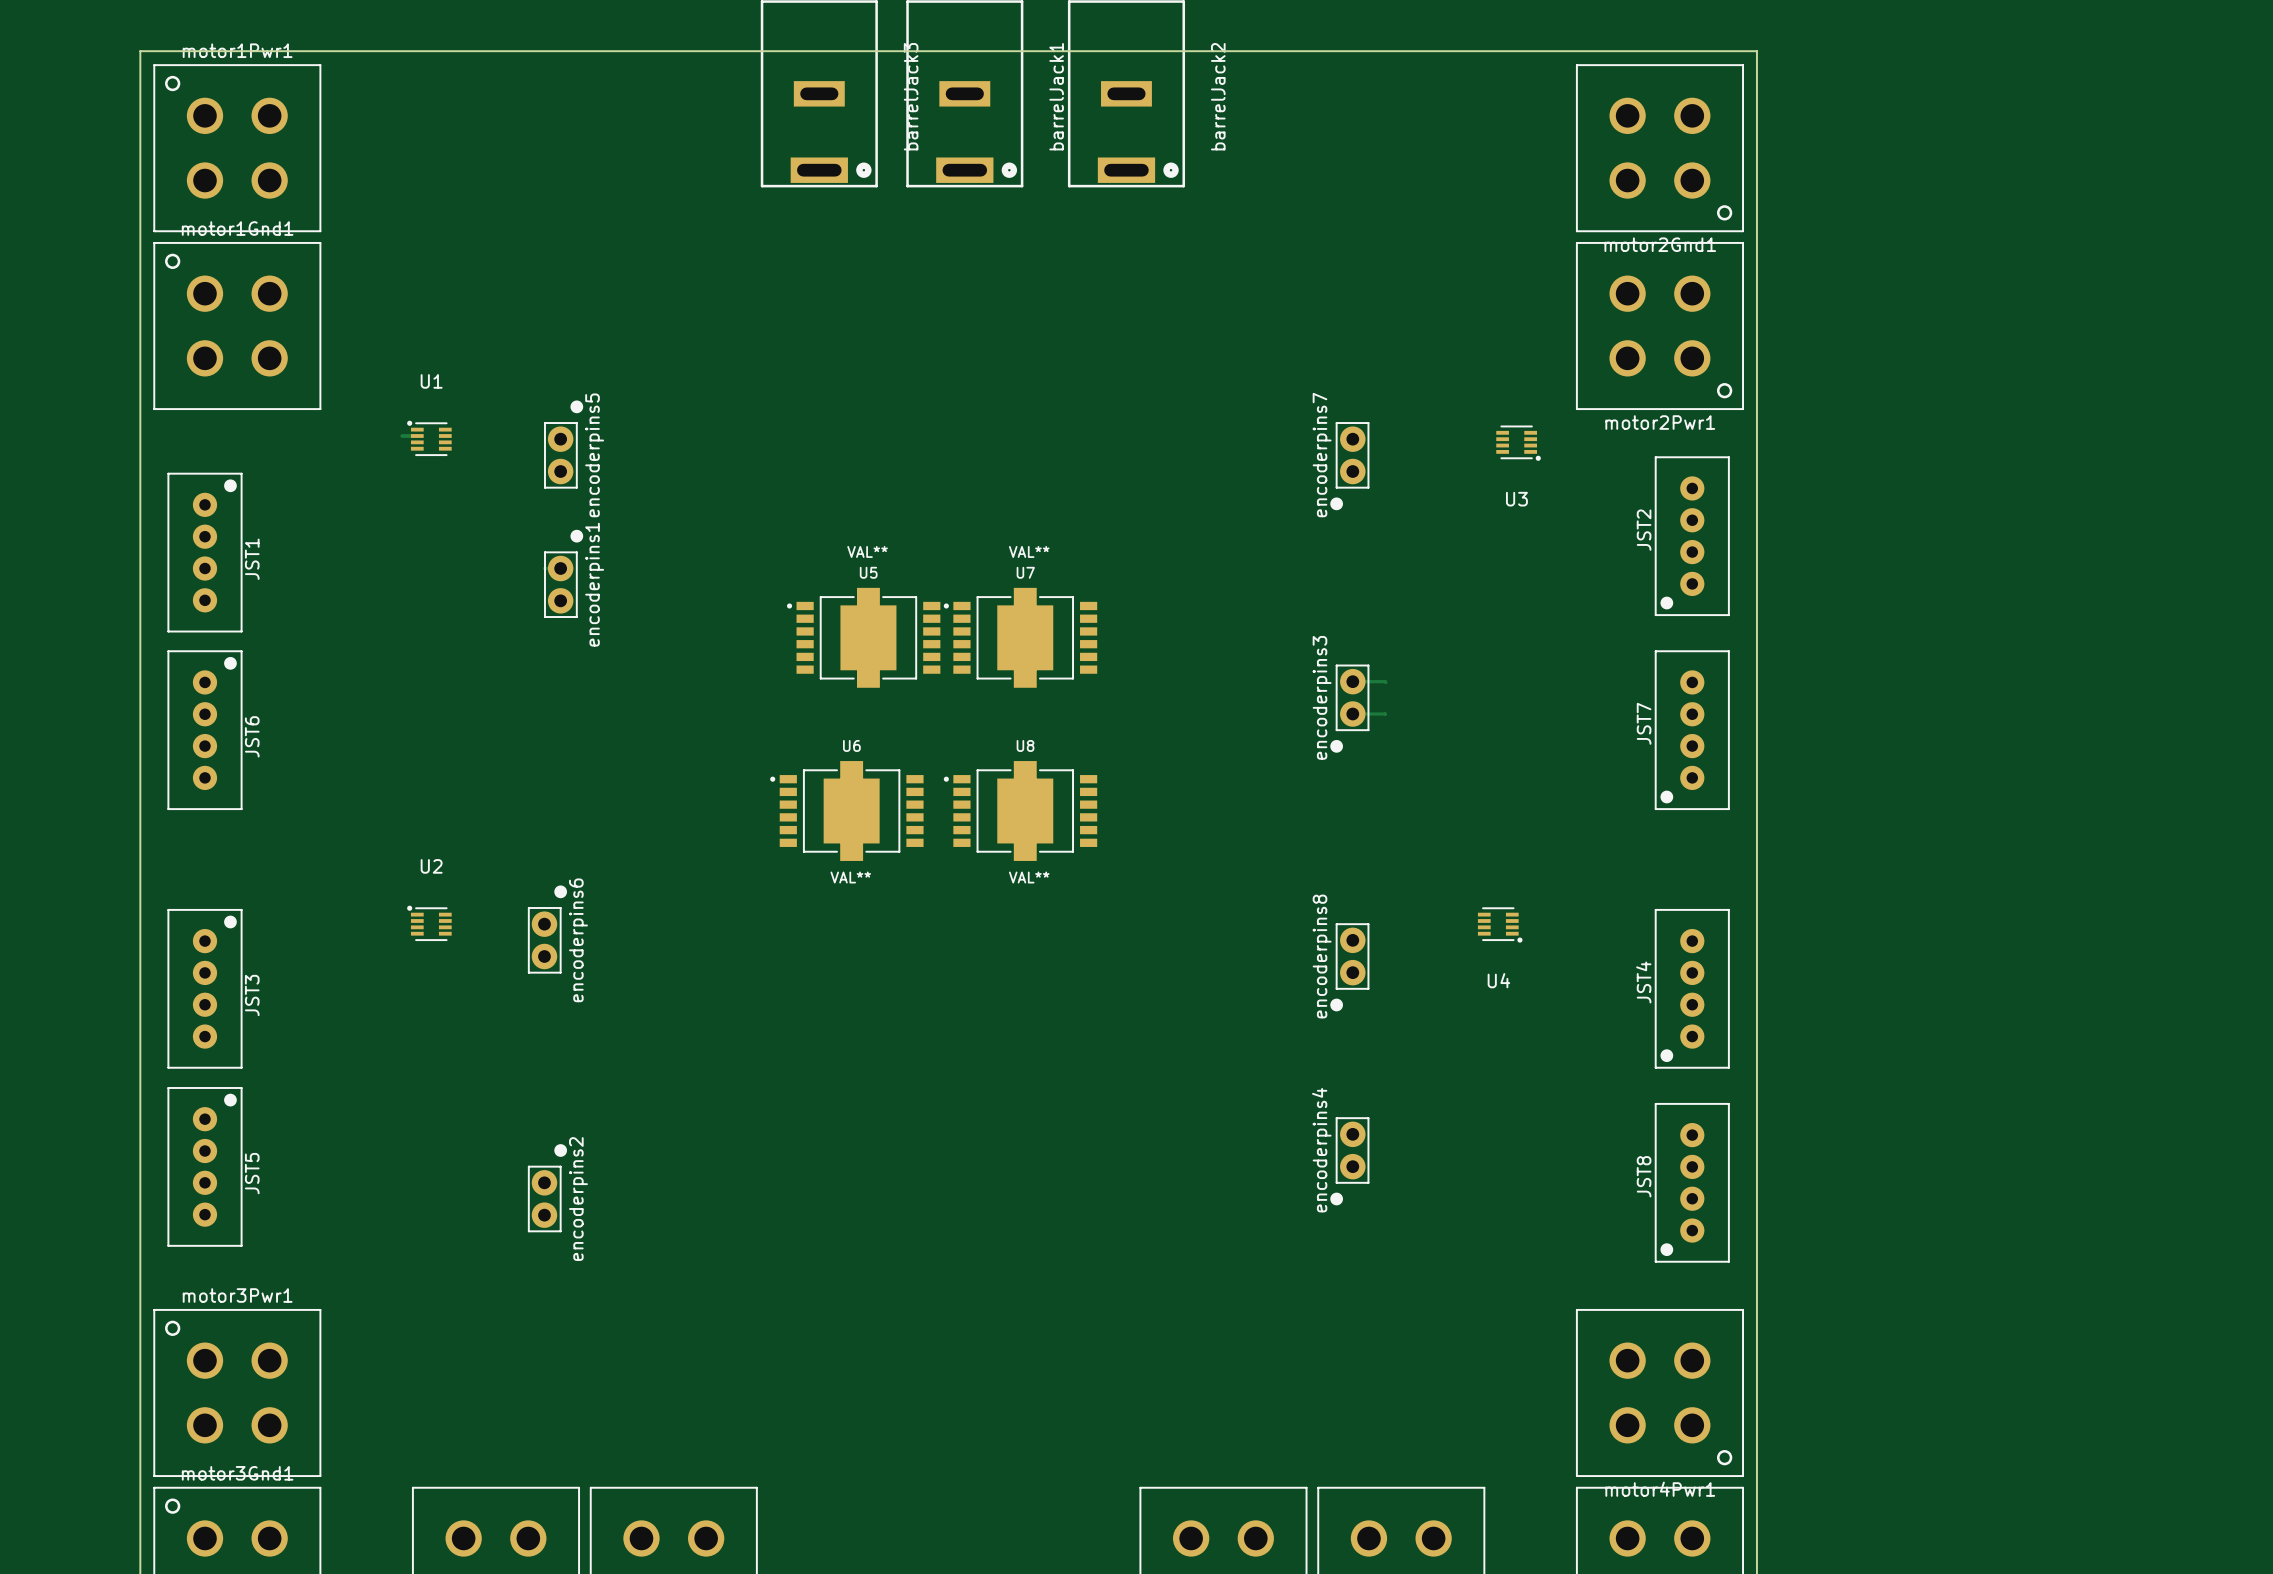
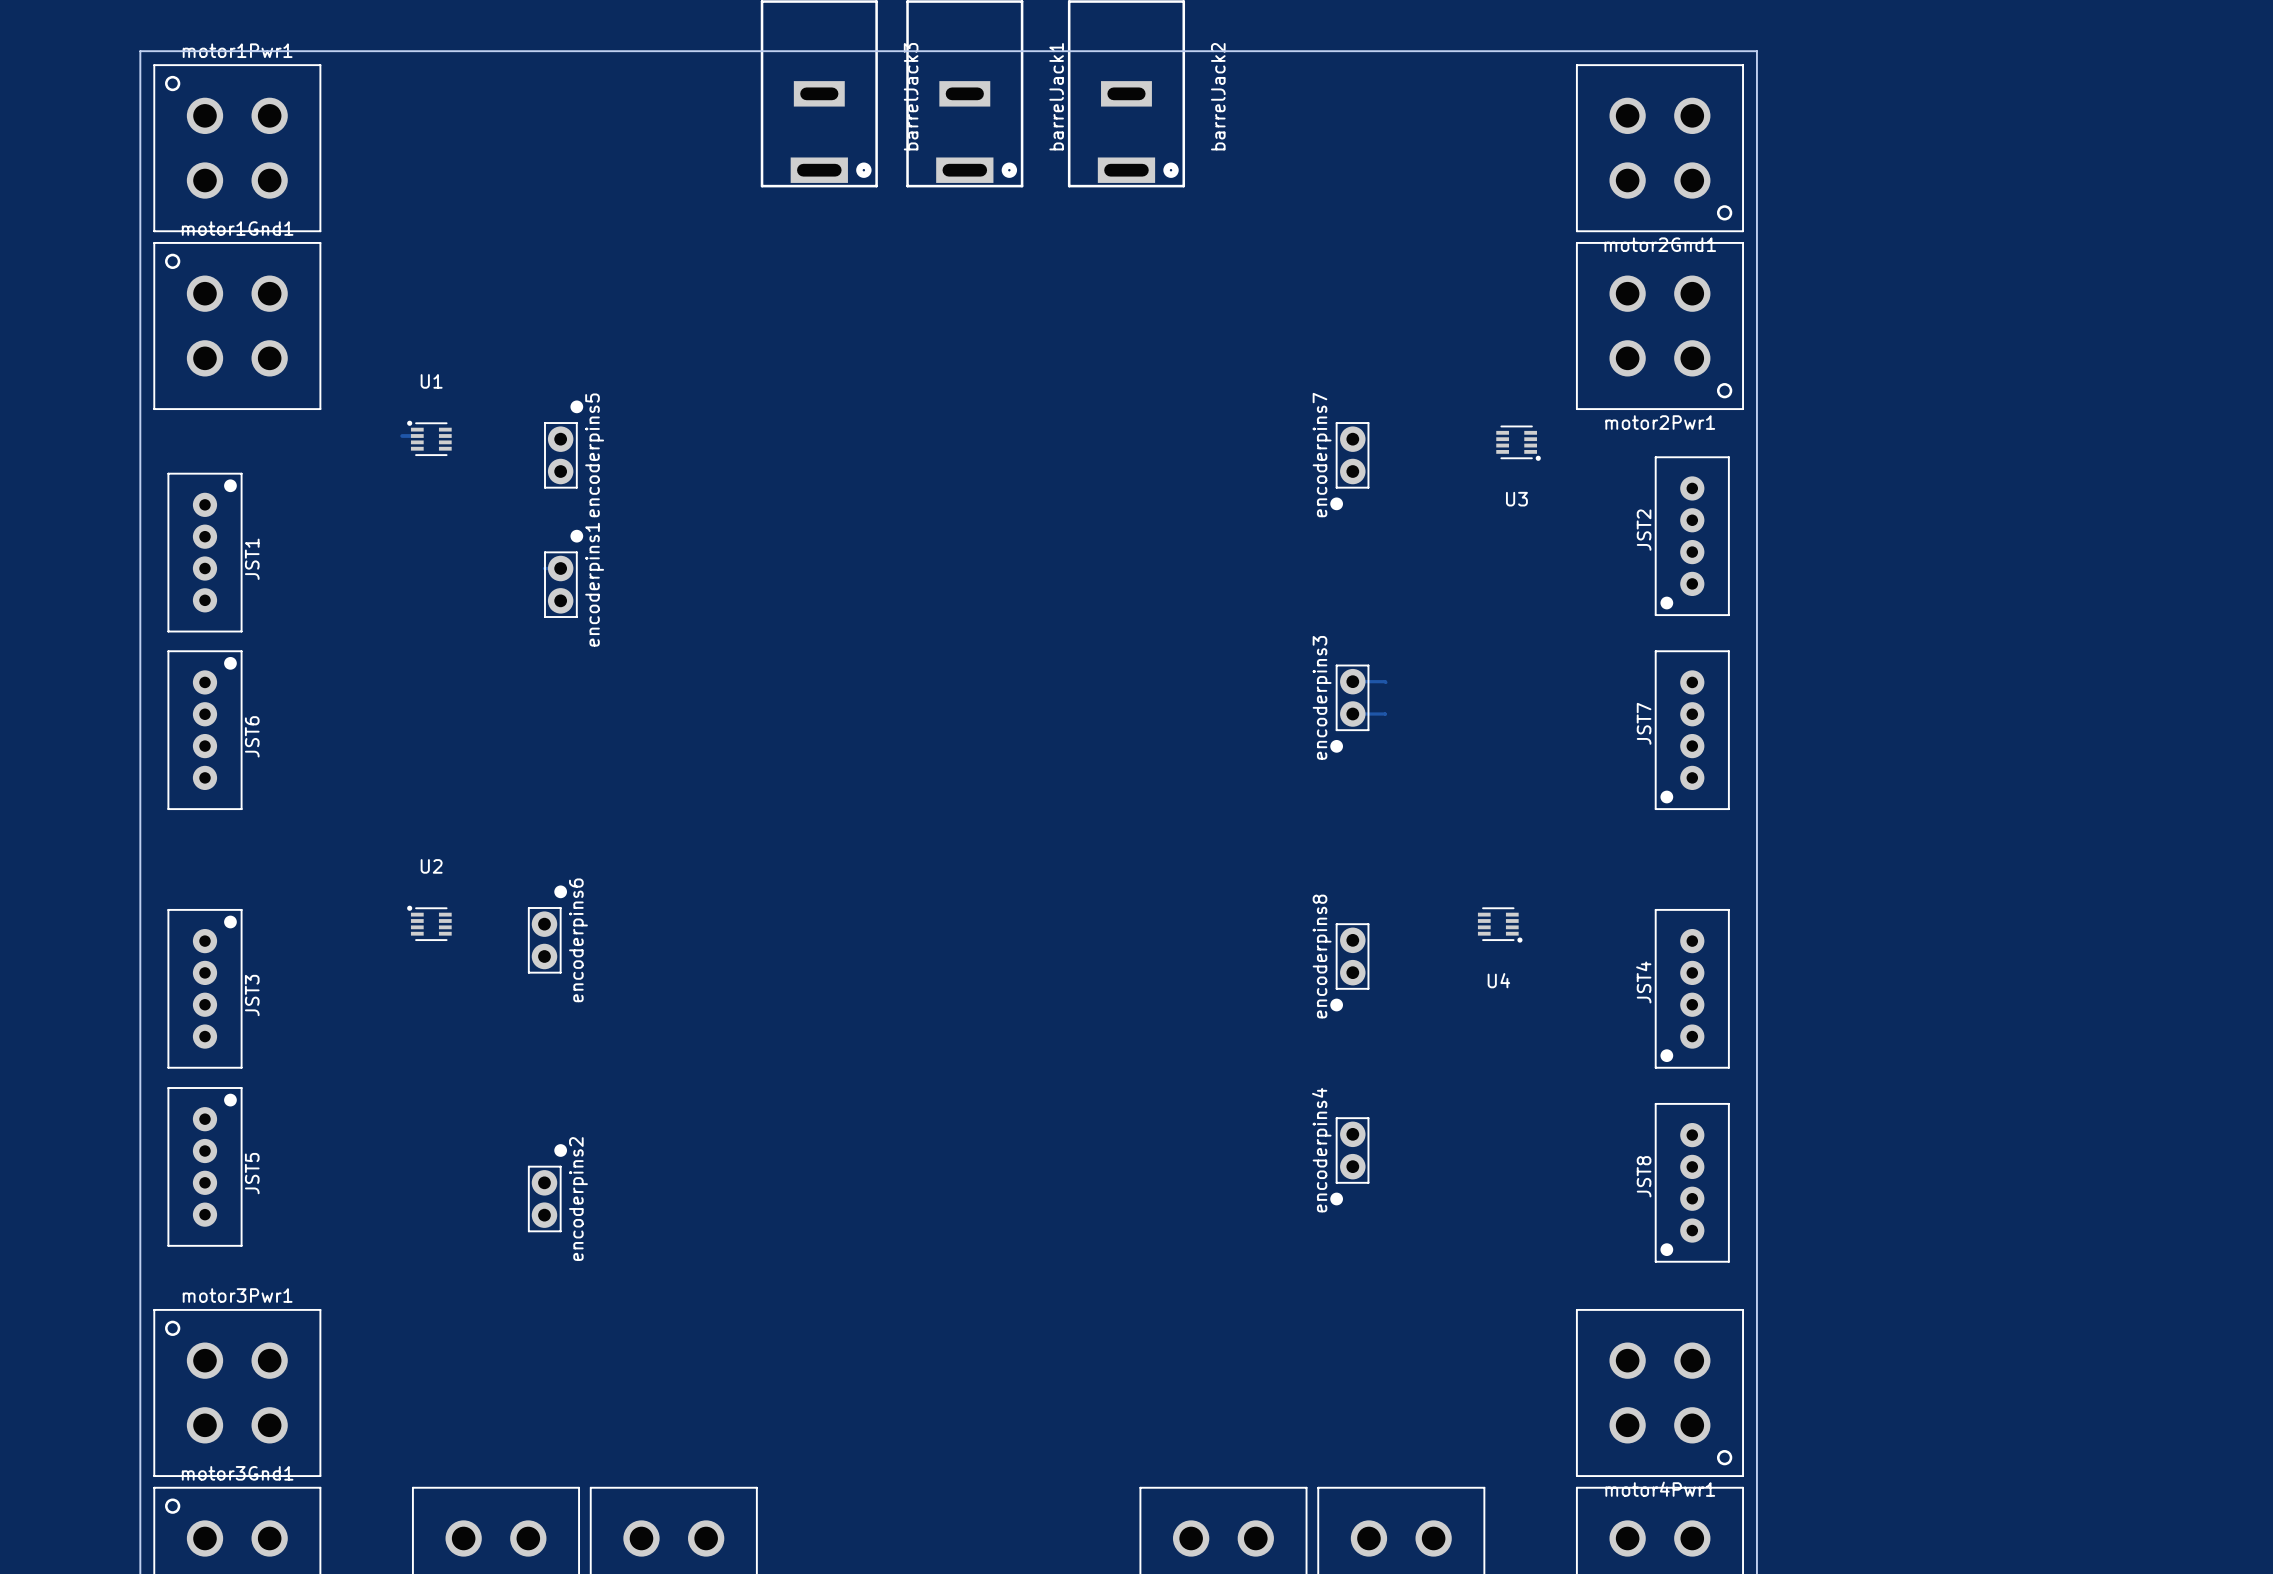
U5: VAL** (863, 637) -> none
U7: VAL** (1020, 637) -> none
U6: VAL** (846, 811) -> none
U8: VAL** (1020, 811) -> none

